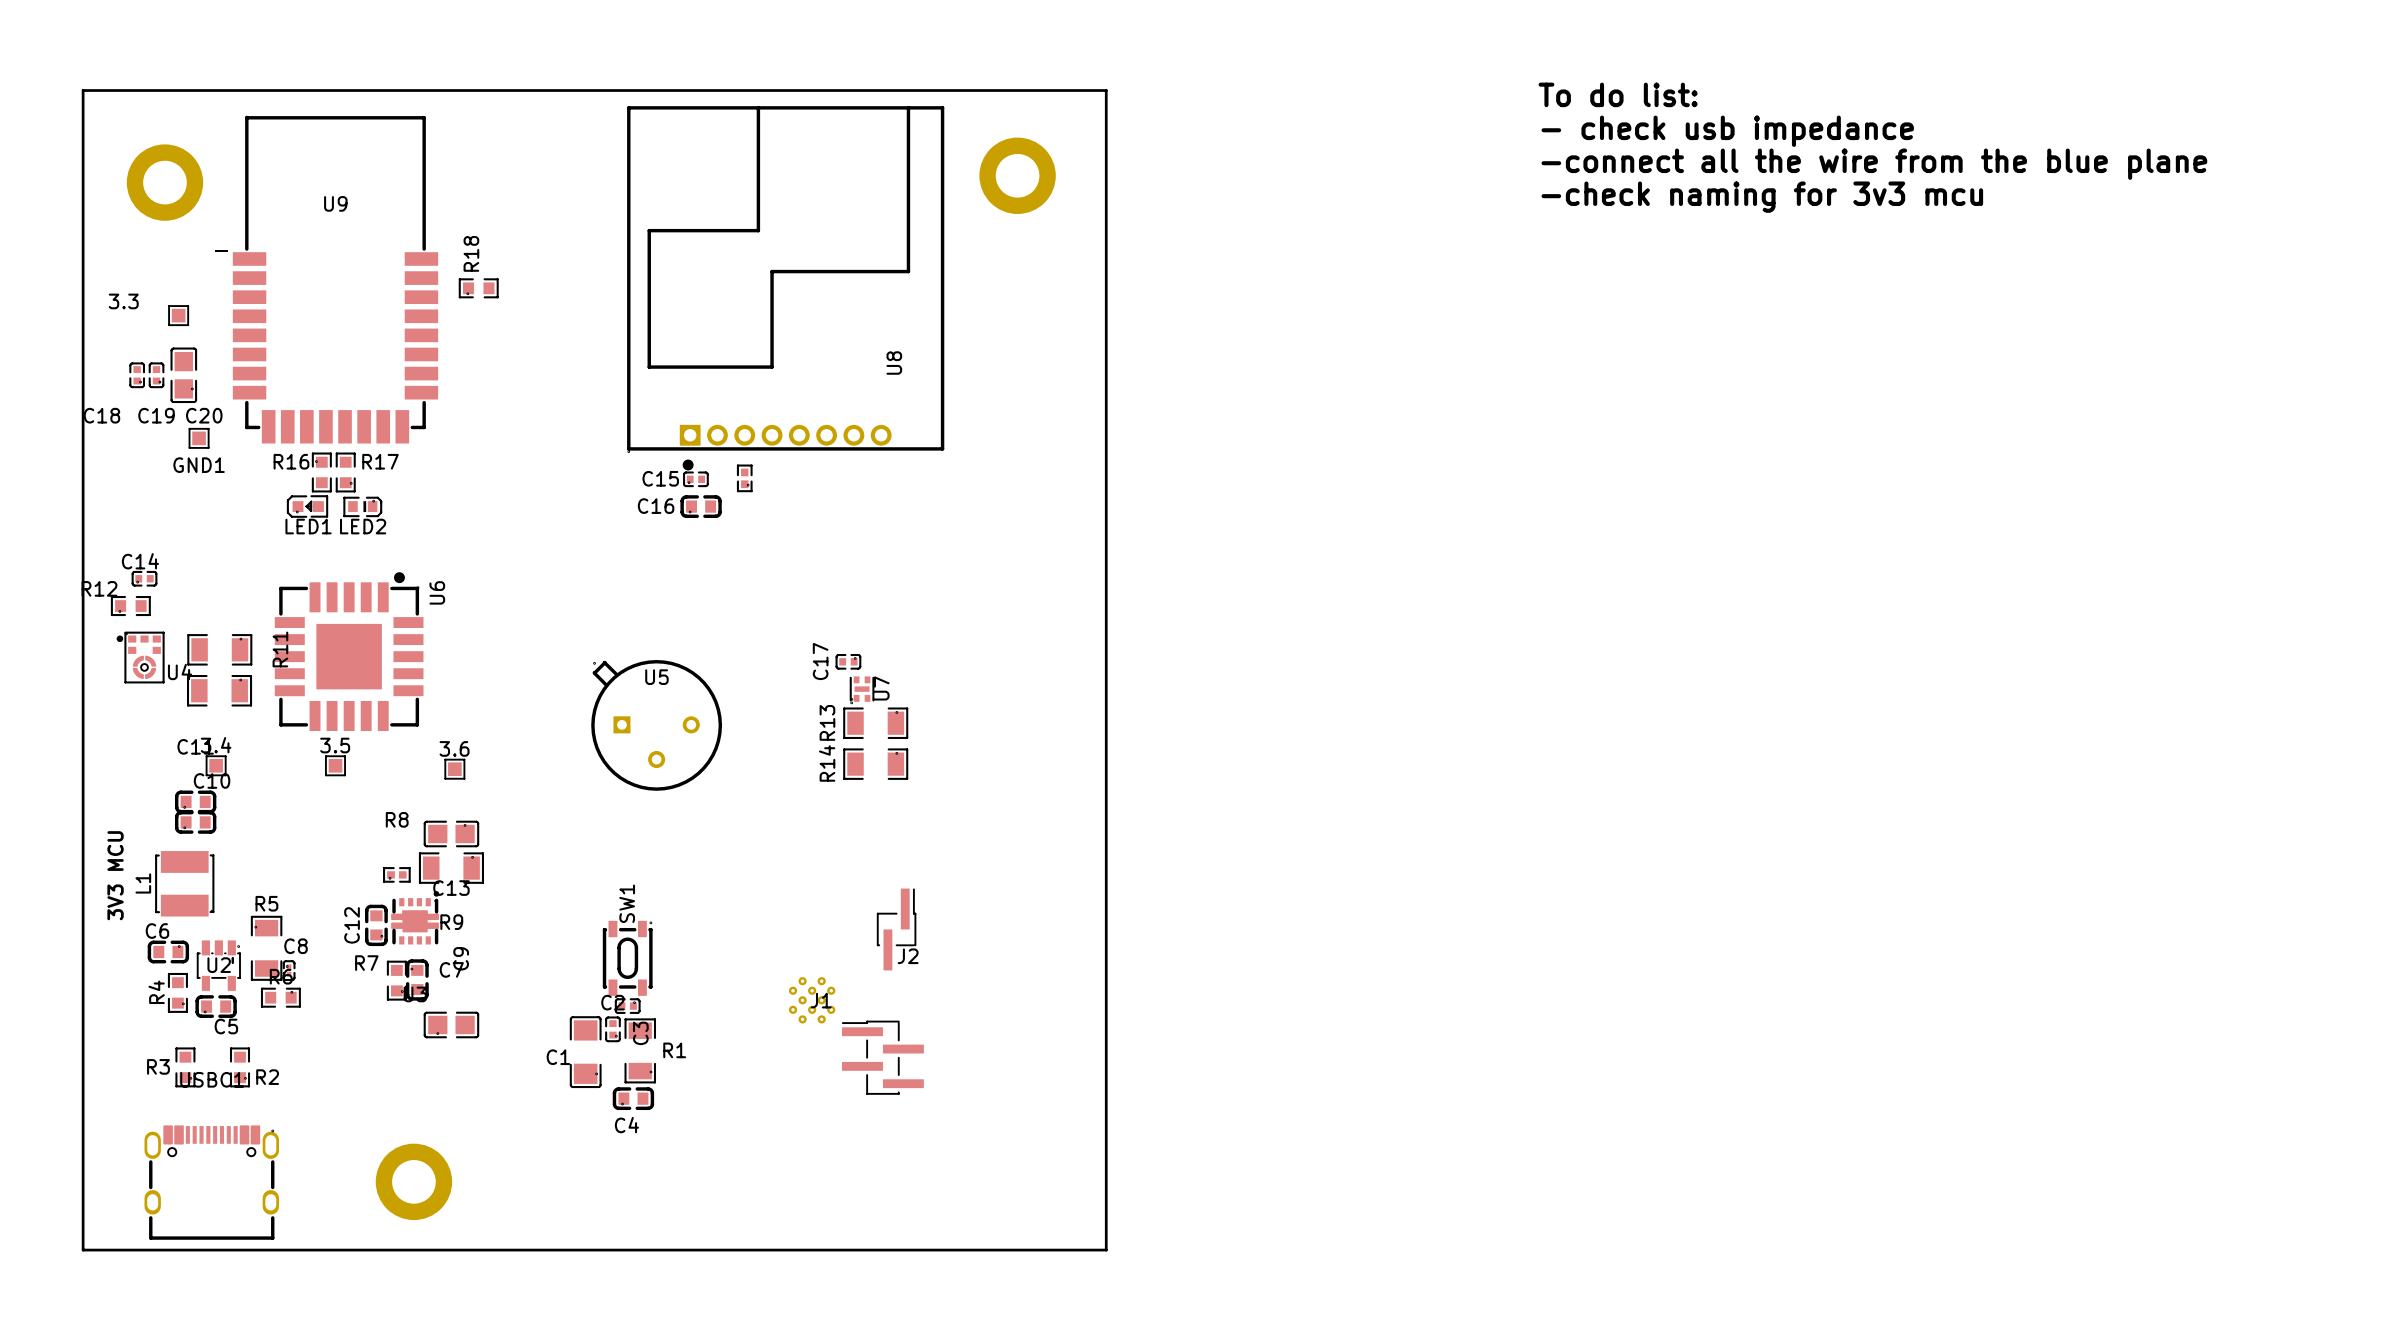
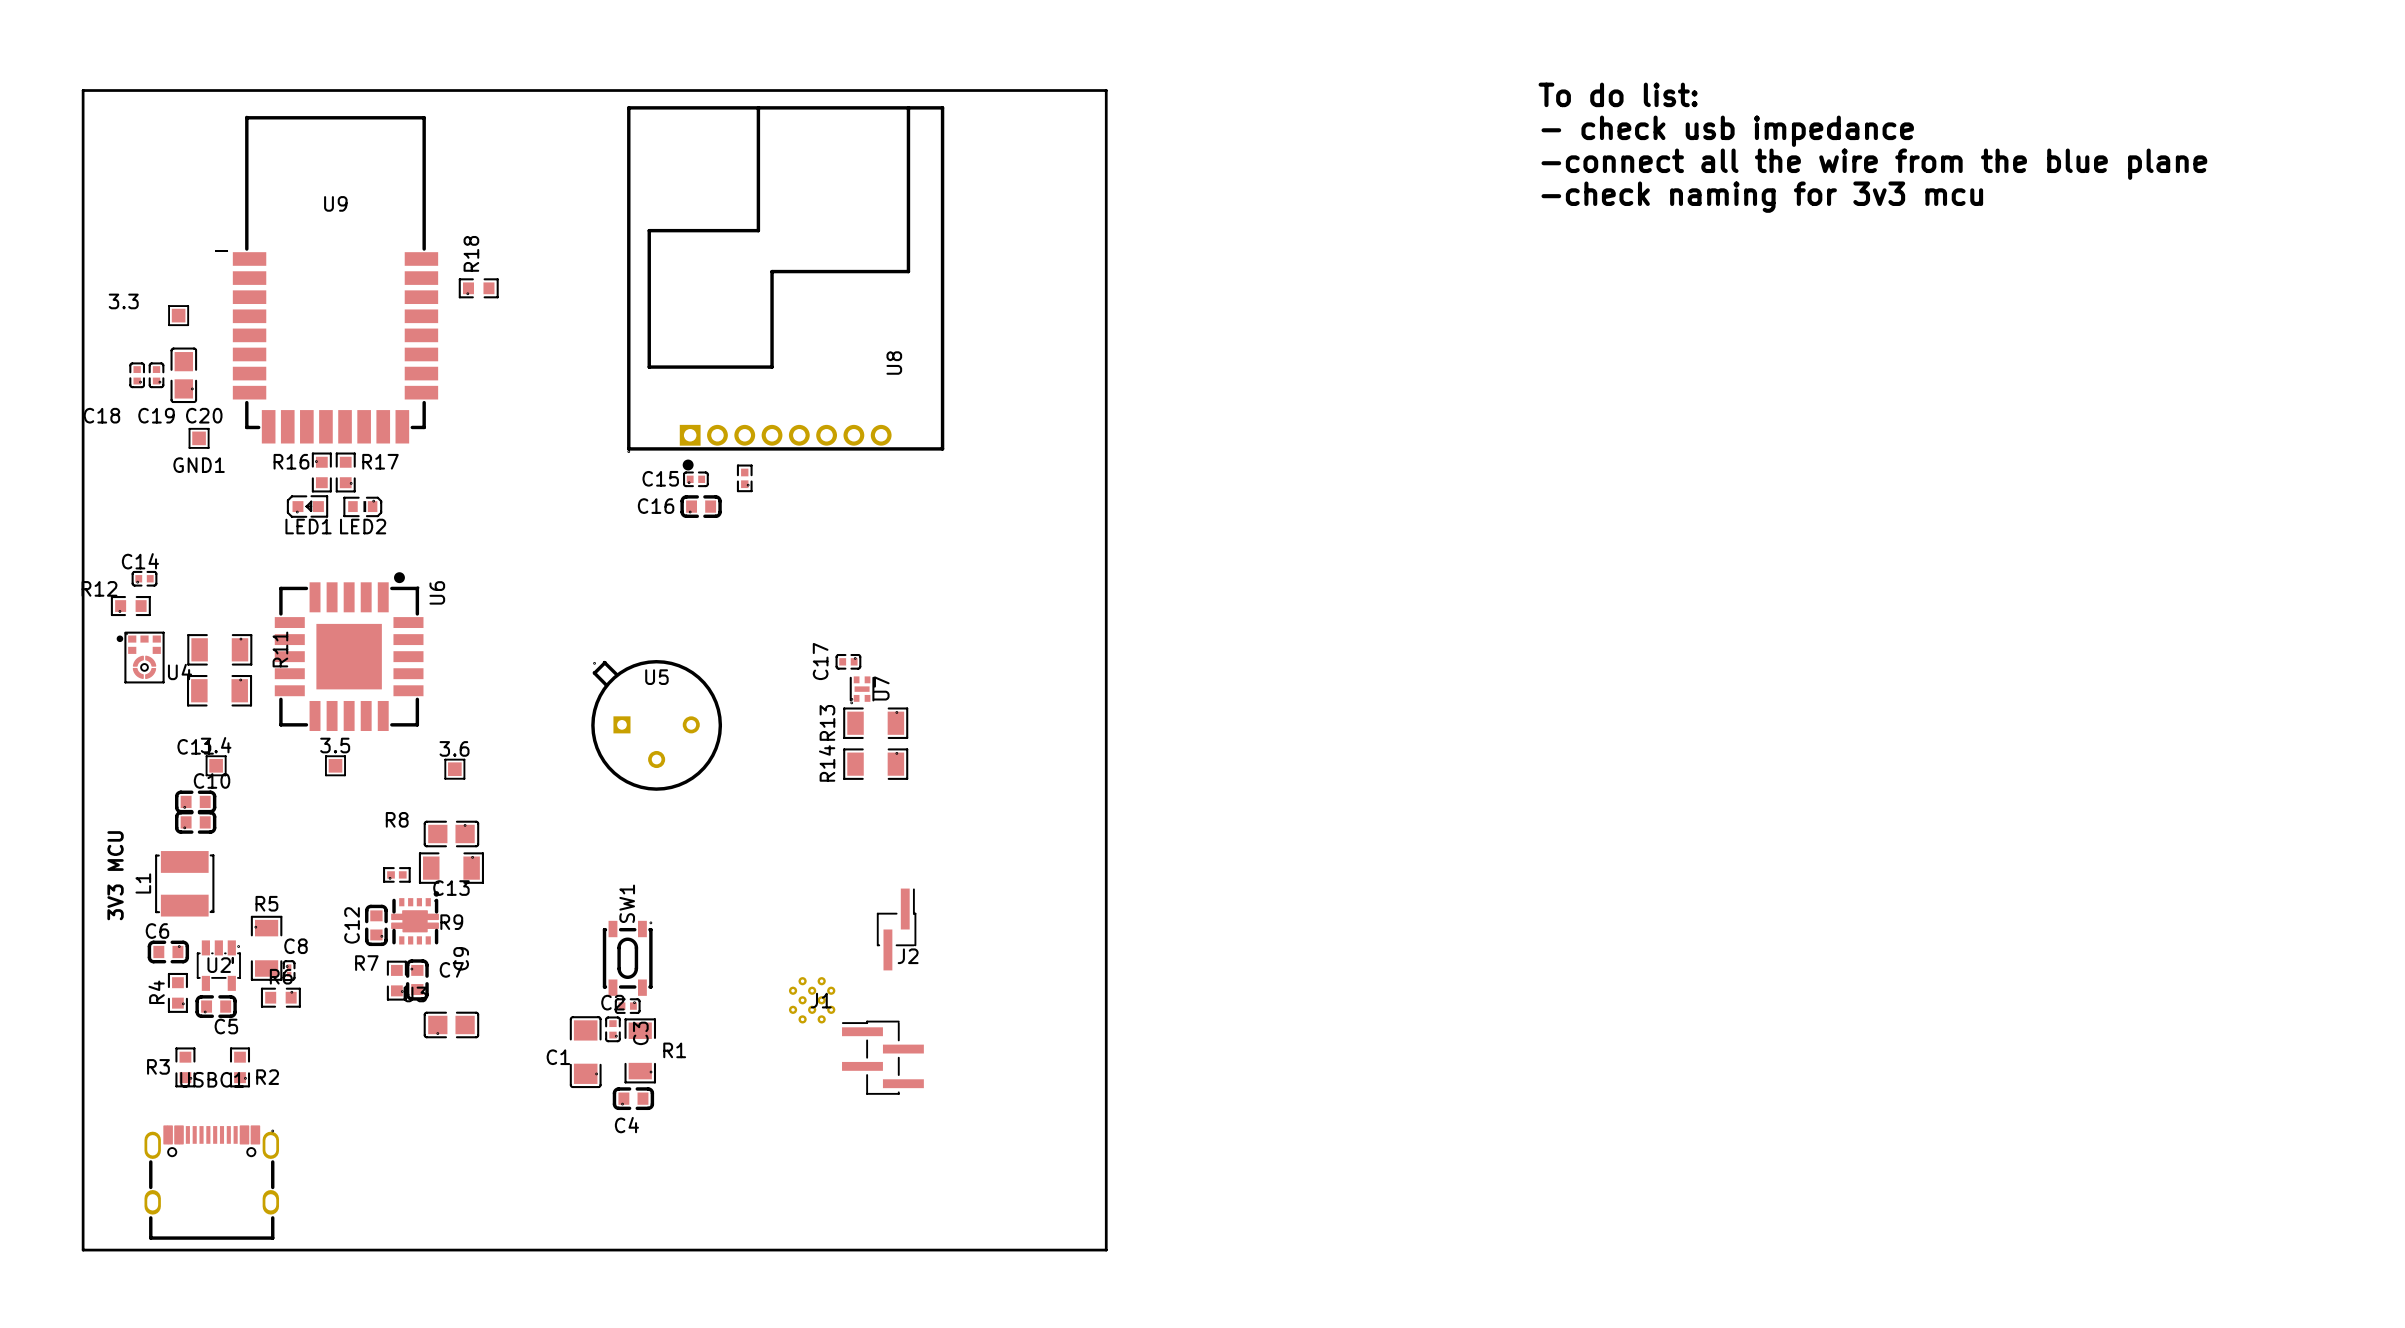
part: (1017, 175) -> none
part: (164, 182) -> none
part: (413, 1181) -> none

